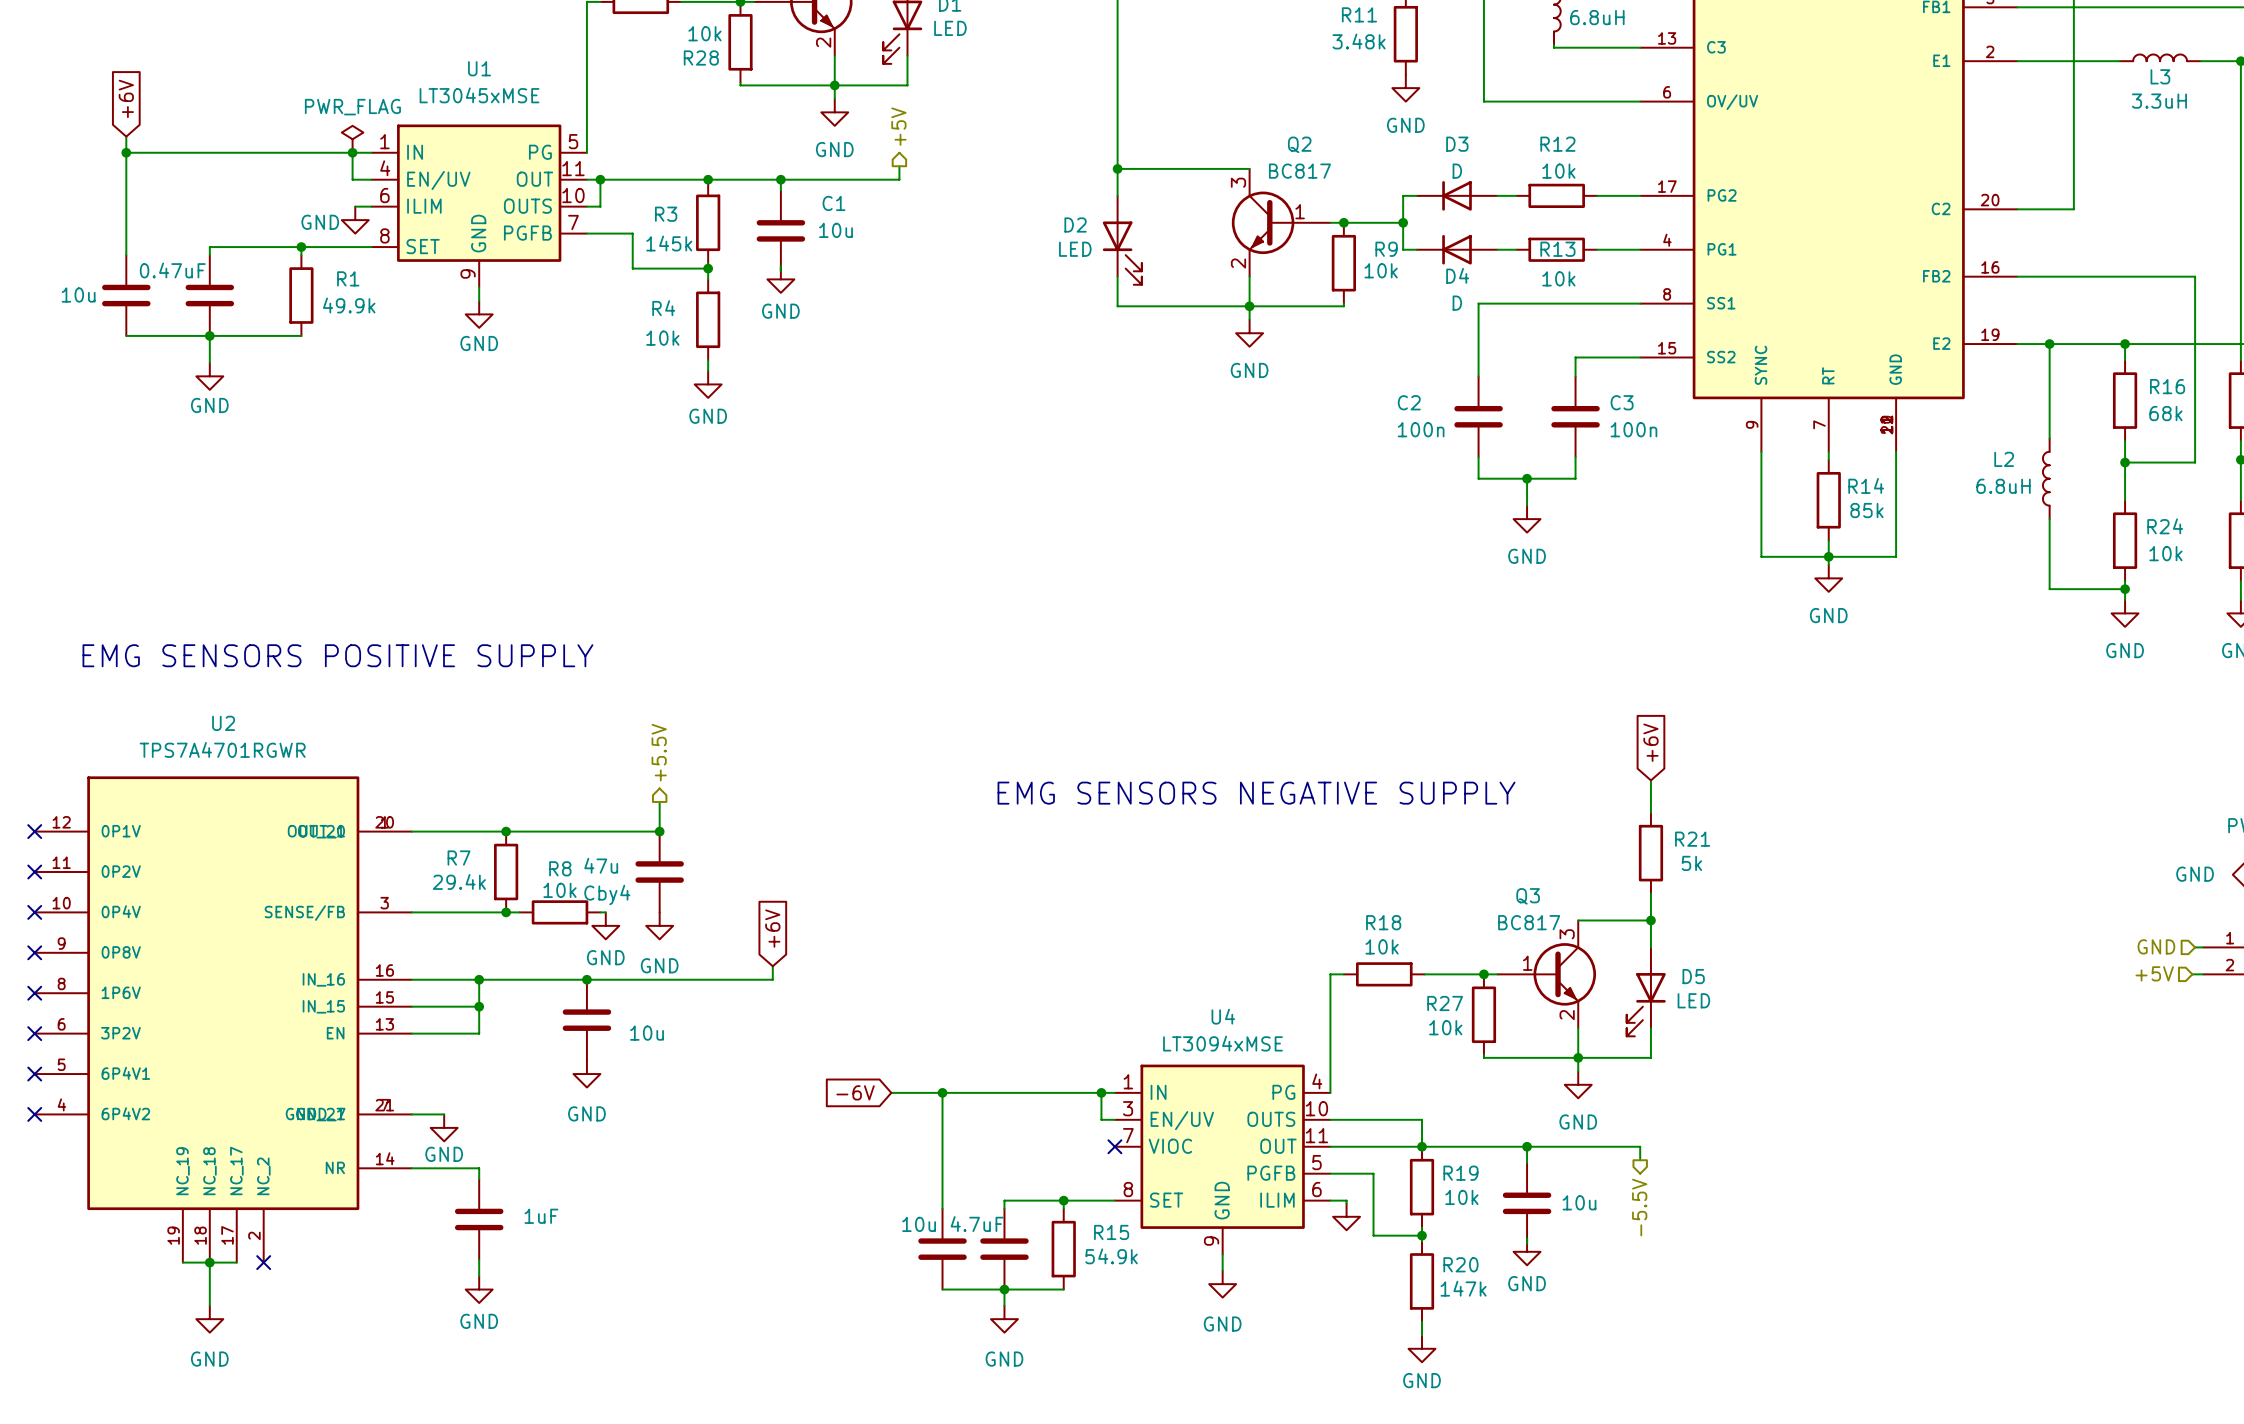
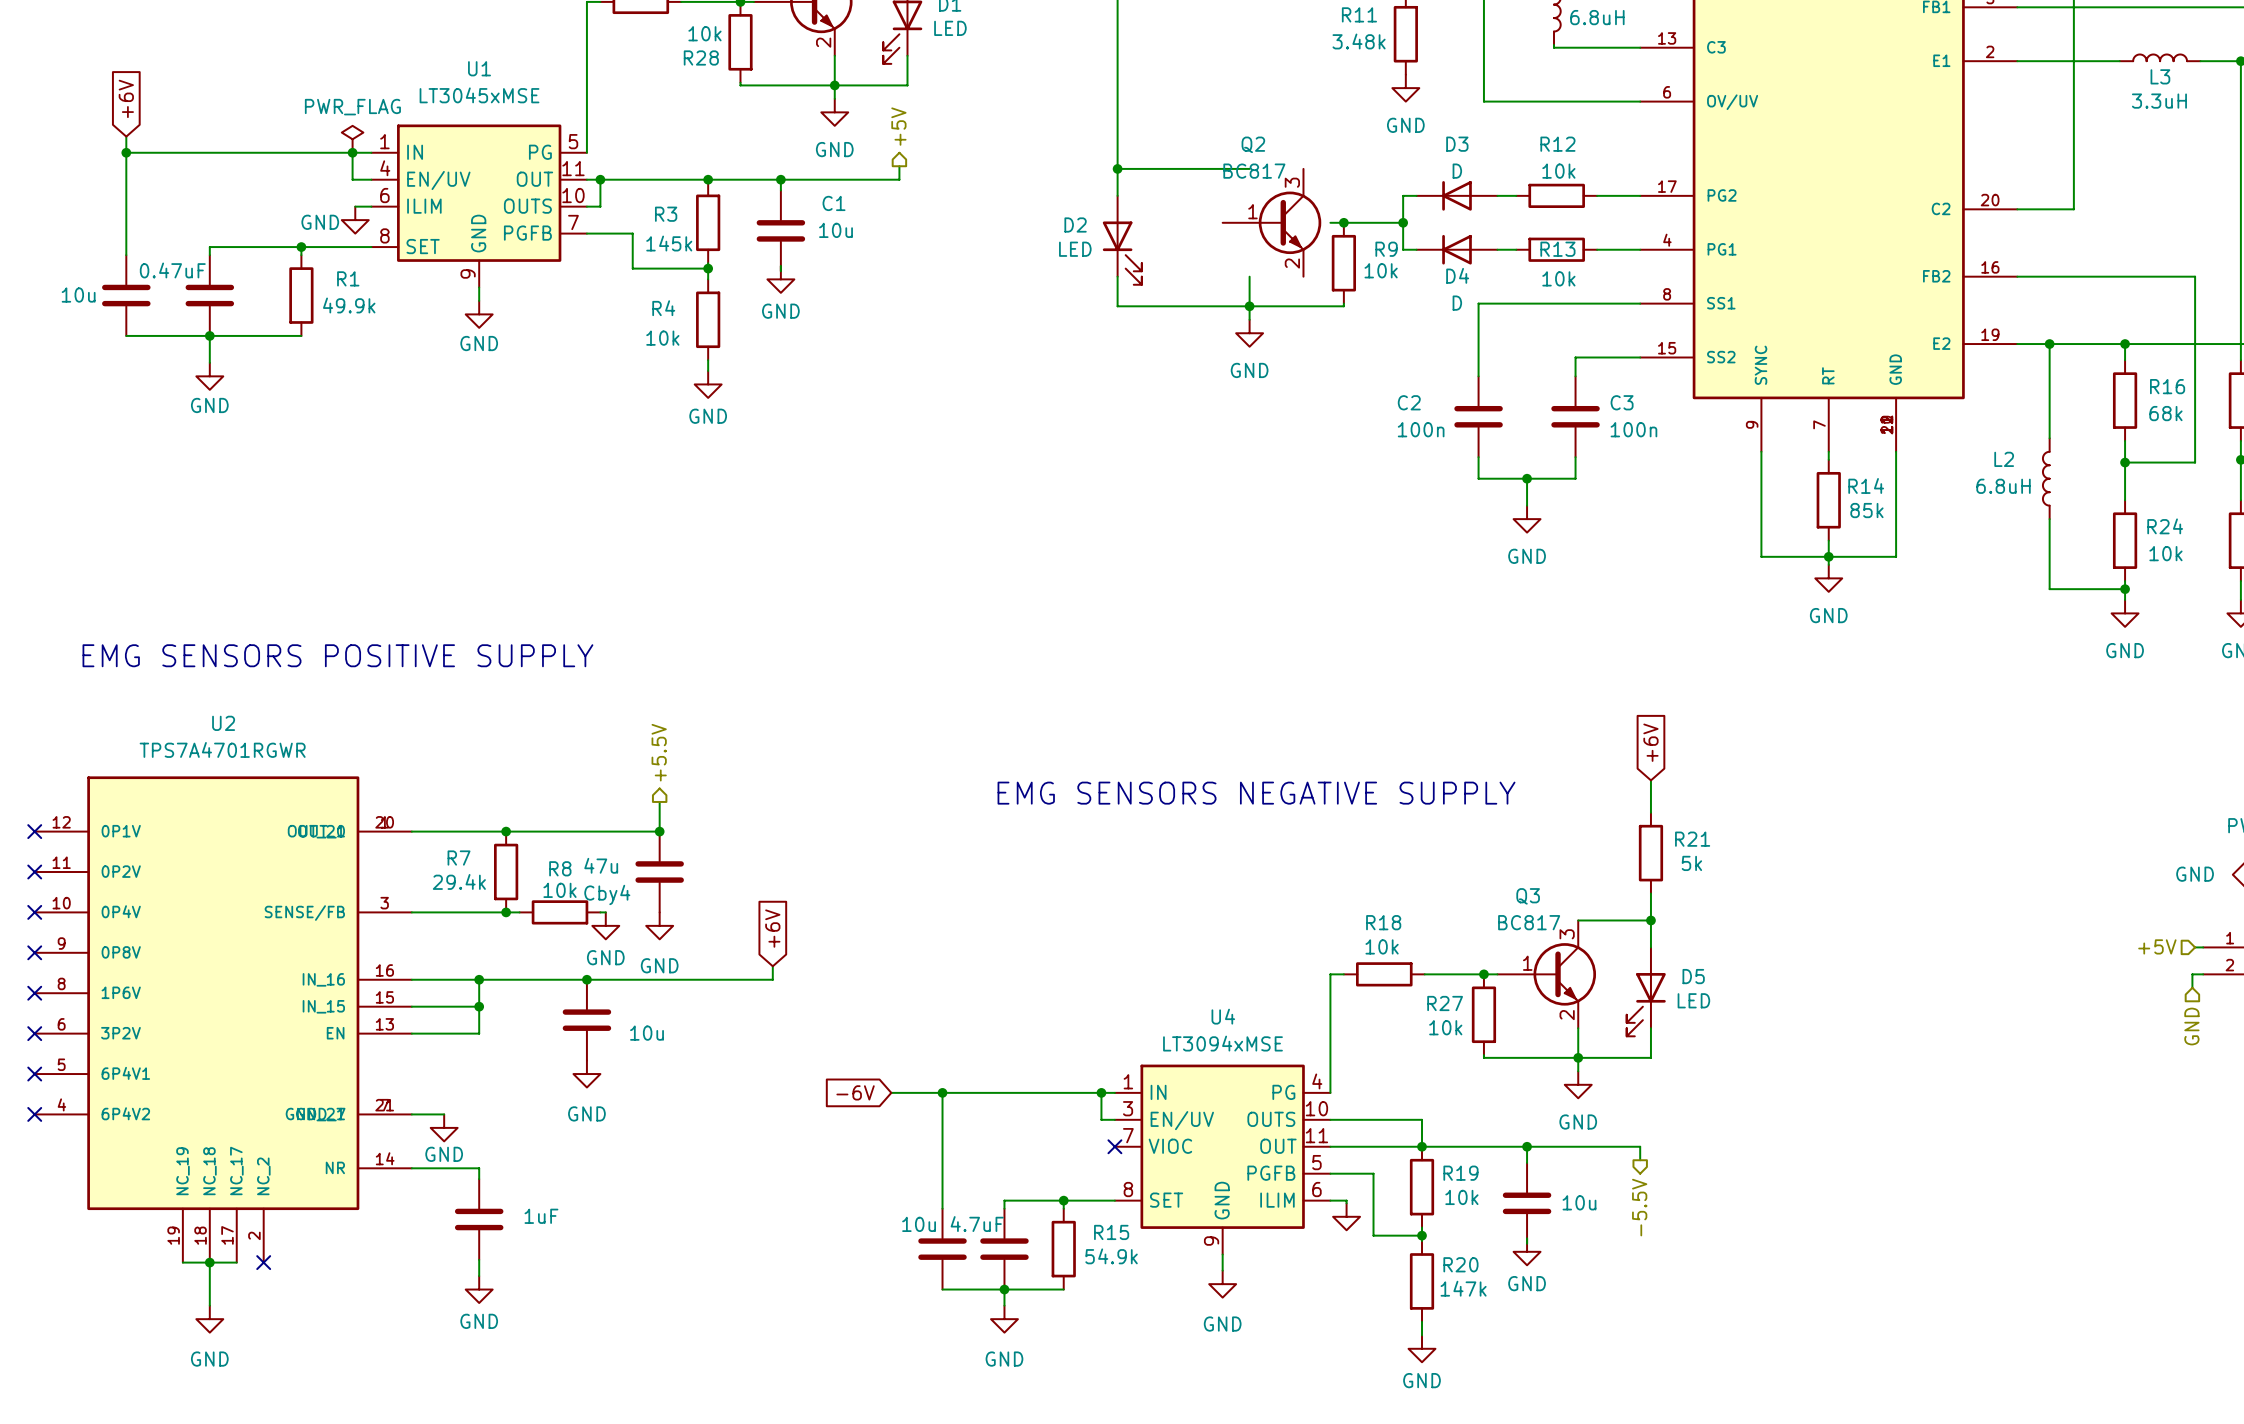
Q2 flip: as is (1263, 222) -> left-right (1290, 222)
hierarchical label: GND (2156, 946) -> +5V (2157, 946)
hierarchical label: +5V (2154, 973) -> none
wire: none -> (2192, 974) (2192, 987)
hierarchical label: none -> GND (2191, 1026)

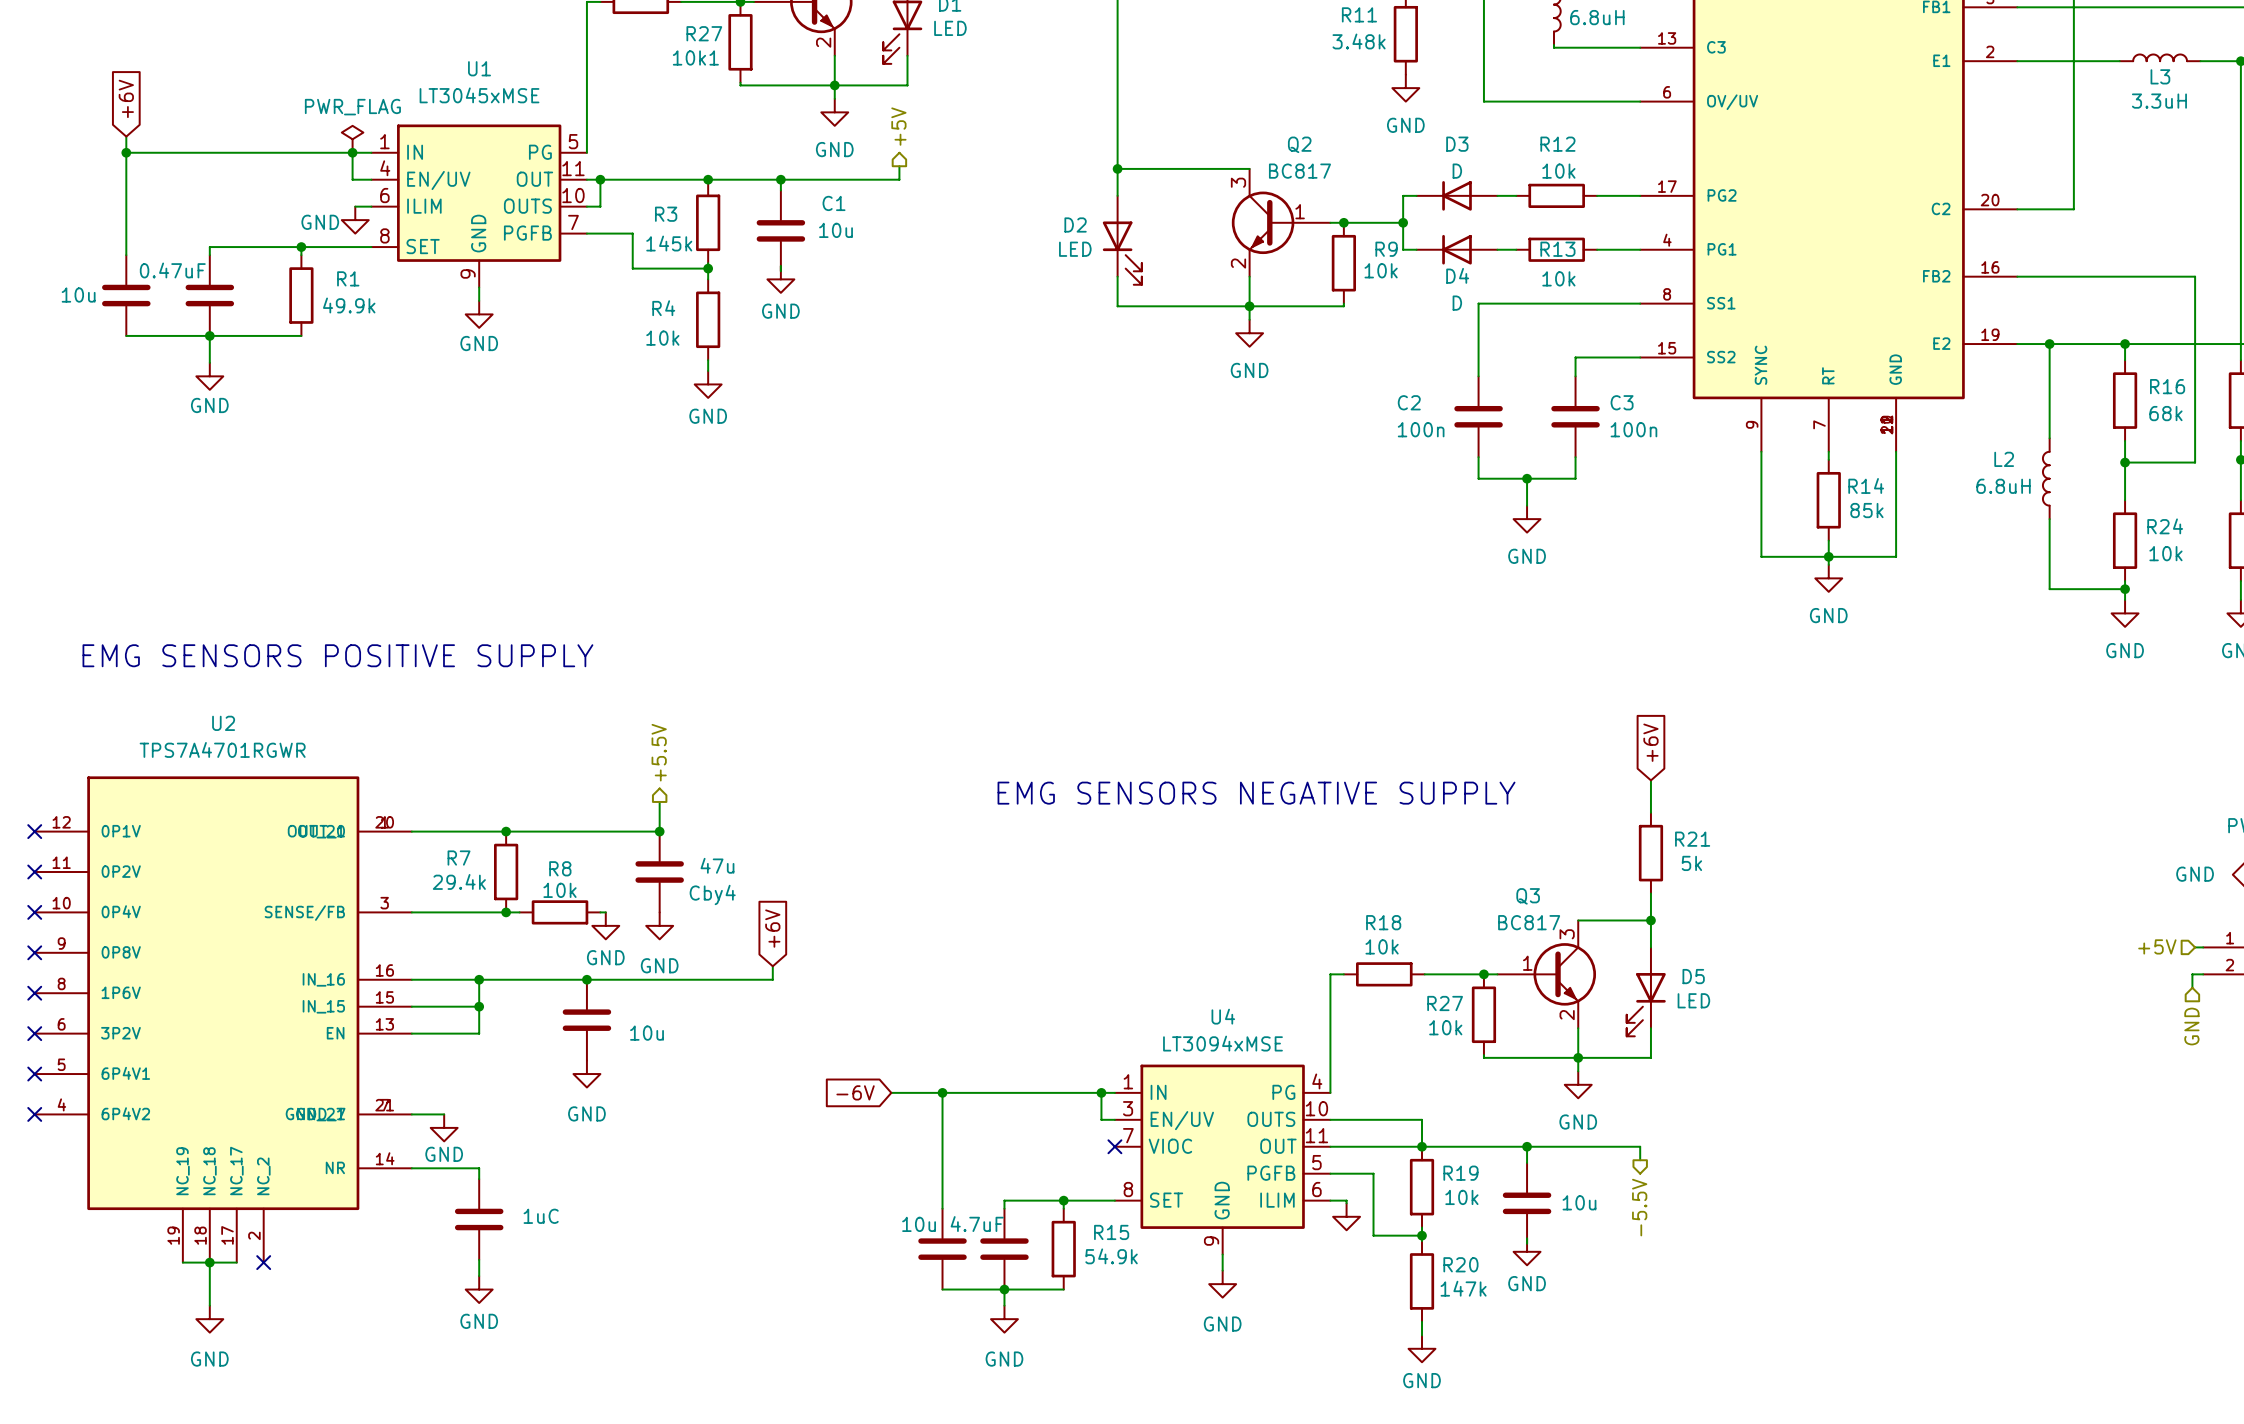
R28 value: 10k (704, 33) -> R27 (704, 33)
R28 name: R28 (701, 57) -> 10k1 (695, 57)
Q2 flip: as is (1290, 222) -> left-right (1263, 222)
Cby4 value position: 47u (601, 865) -> 47u (717, 865)
Cby4 name position: Cby4 (607, 894) -> Cby4 (712, 894)
part value: 1uF (541, 1216) -> 1uC (541, 1216)

